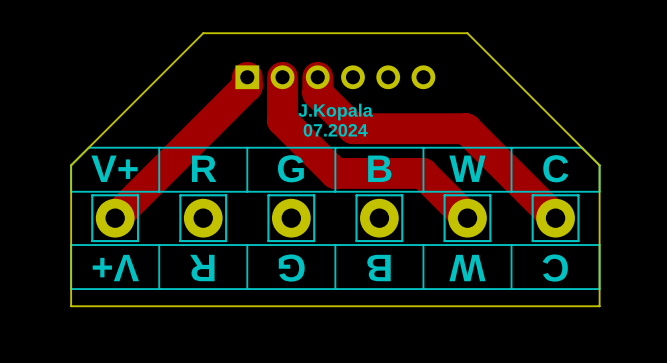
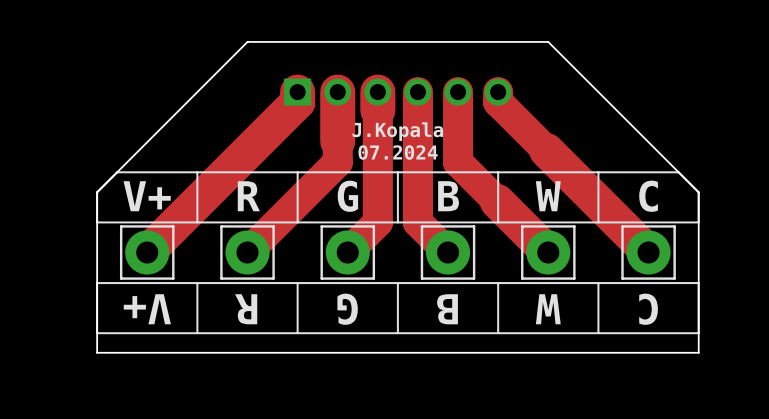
track: none -> (417, 92) (417, 222) (448, 252)
track: (317, 93) (353, 128) (466, 128) -> (498, 92) (498, 102) (546, 150)
track: none -> (377, 110) (377, 222) (347, 252)
track: (282, 120) (335, 173) (422, 173) -> (458, 92) (458, 162) (497, 201)
track: none -> (337, 141) (337, 162) (247, 252)

